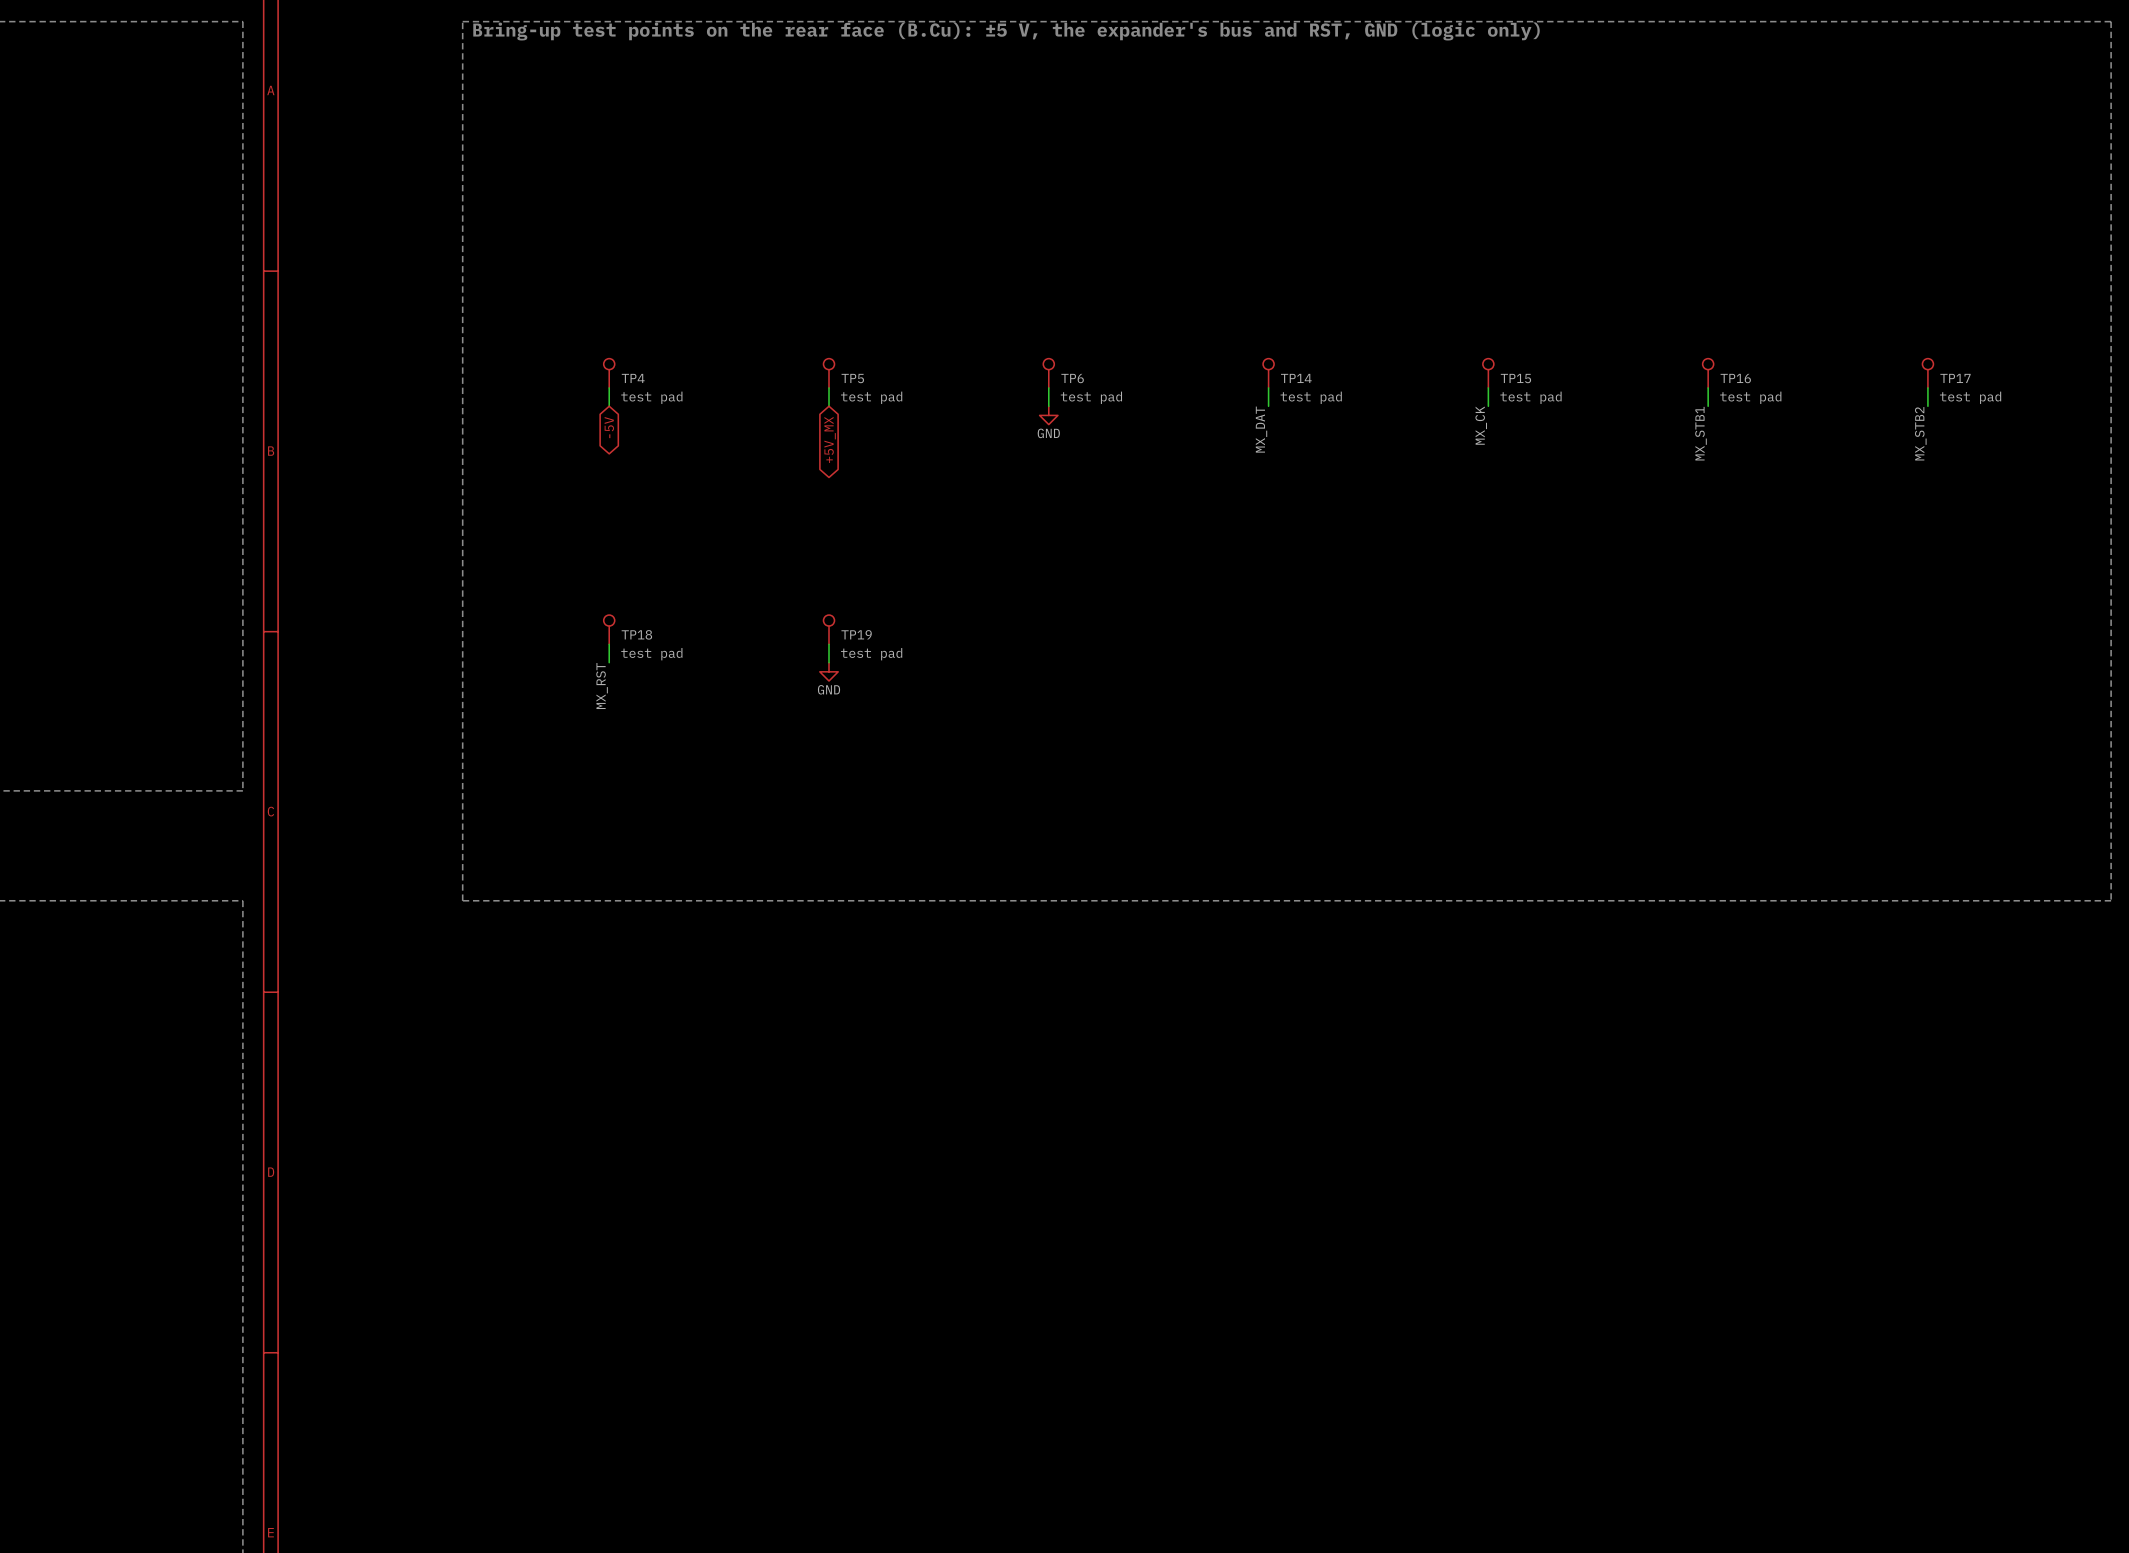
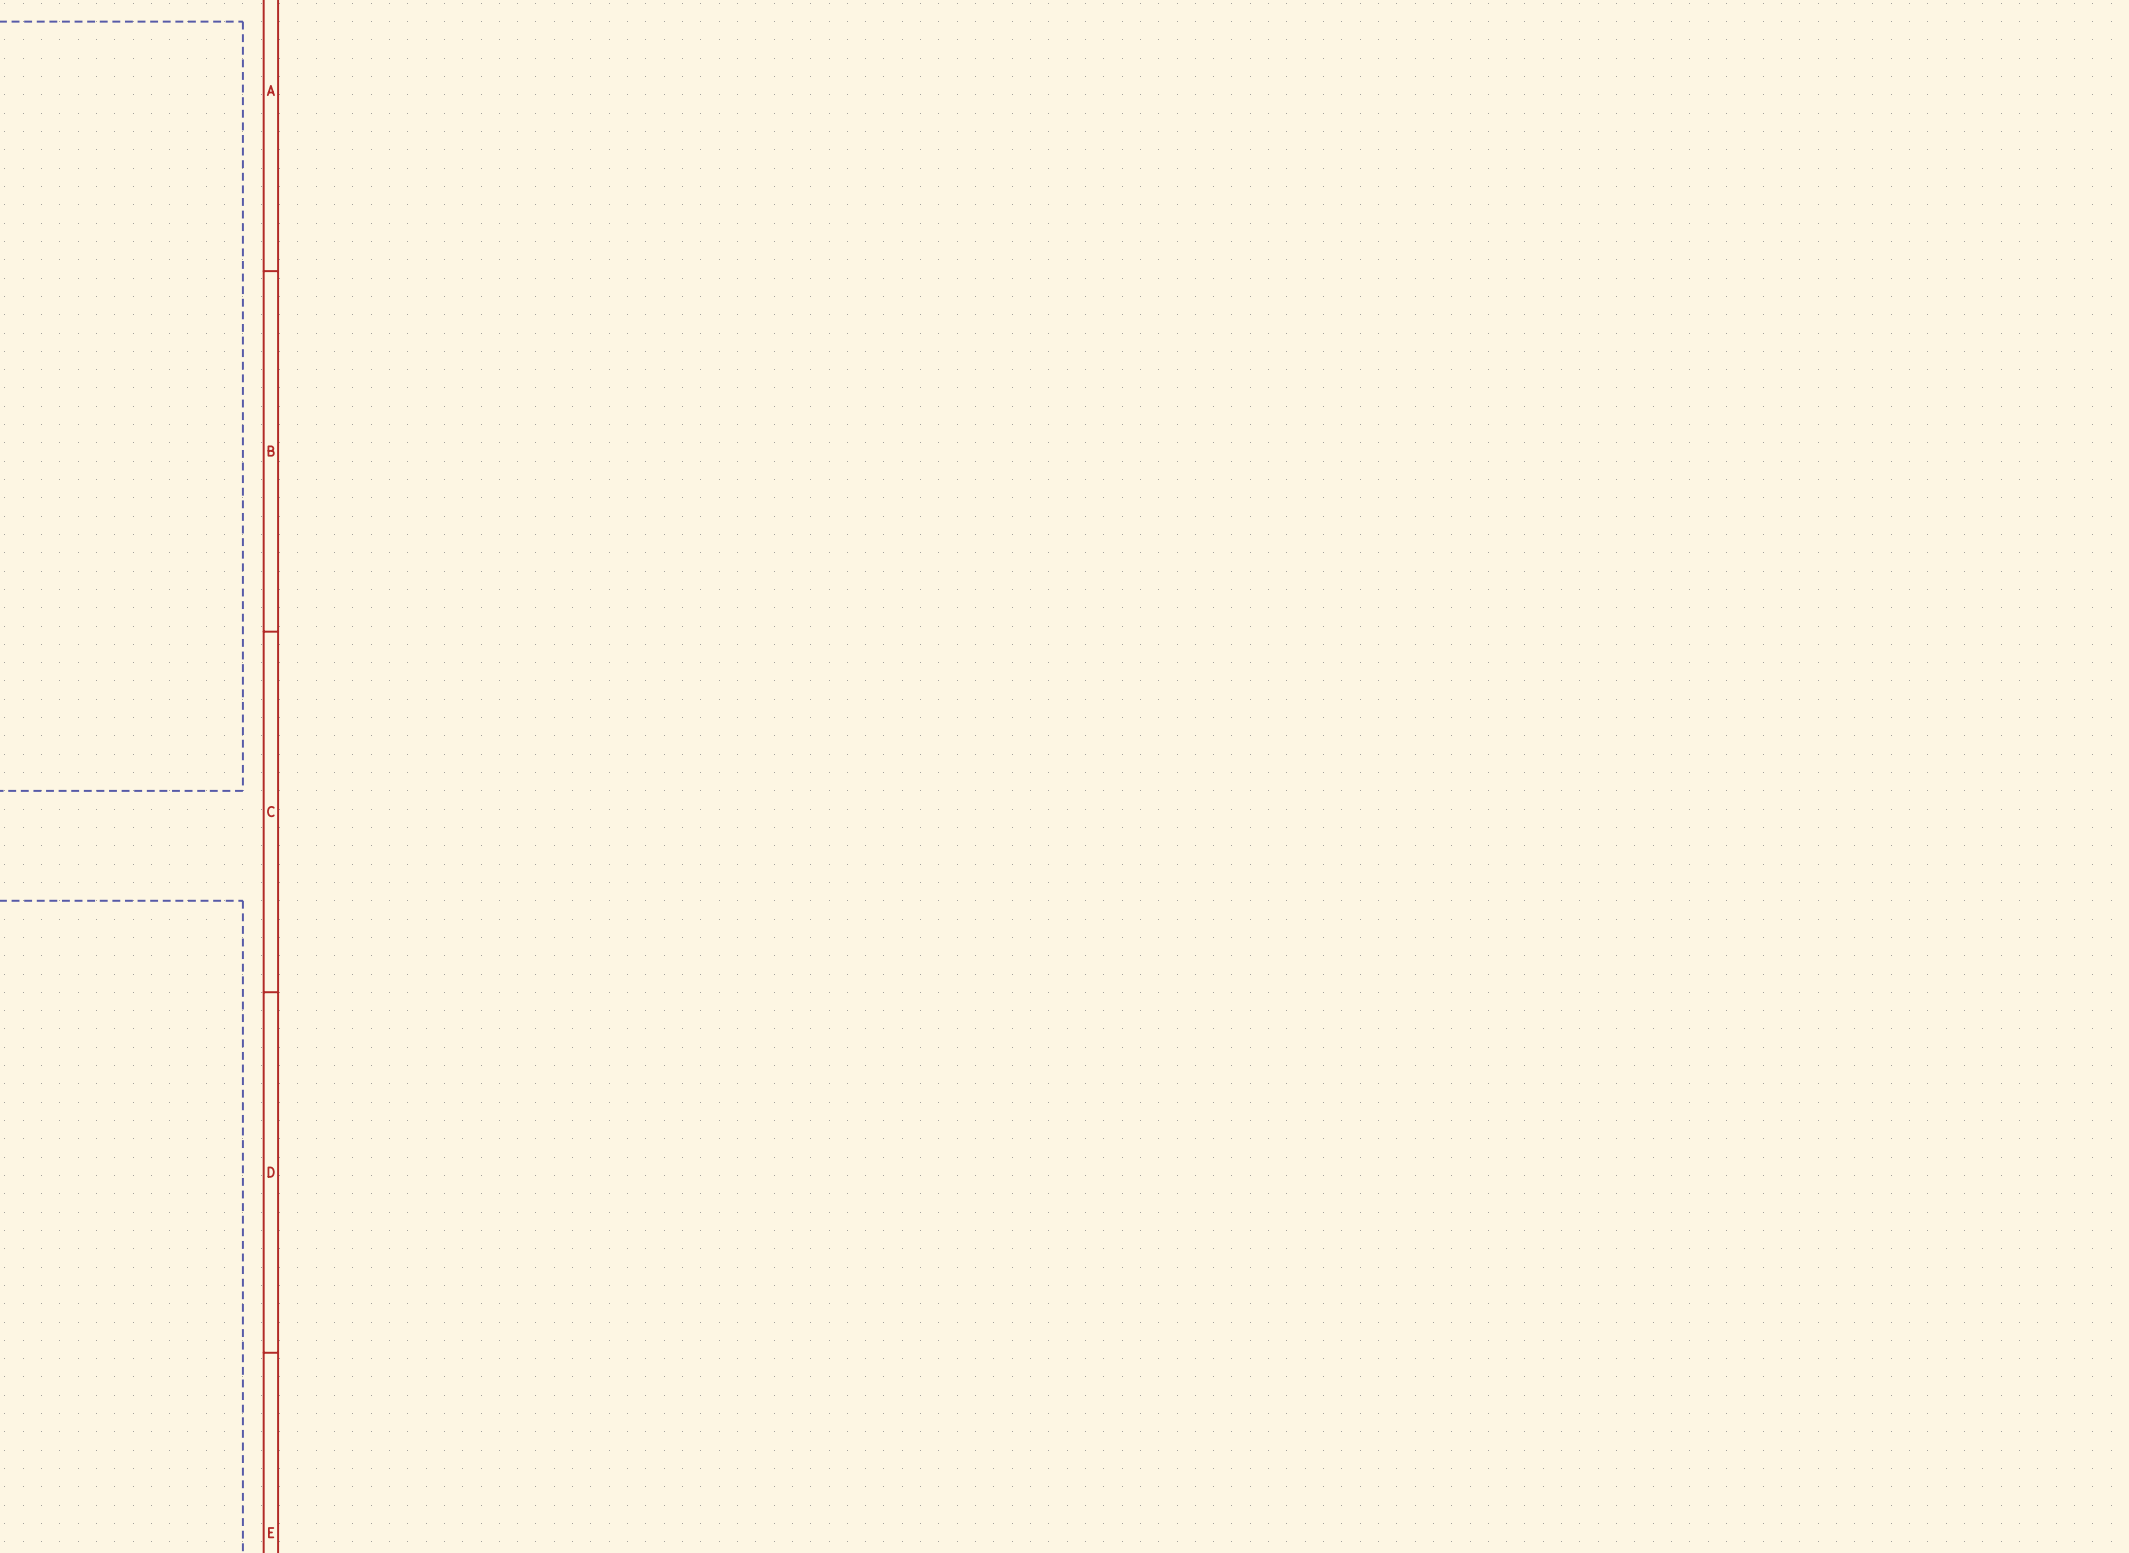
line: (462, 21) (2111, 21) (2111, 900) (462, 900) (462, 21) -> none
text: Bring-up test points on the rear face (B.Cu): ±5 V, the expander's bus and RST, GND (logic only) (1006, 31) -> none
TP4: test pad (609, 373) -> none
TP5: test pad (829, 373) -> none
TP6: test pad (1048, 373) -> none
TP14: test pad (1268, 373) -> none
TP15: test pad (1488, 373) -> none
TP16: test pad (1708, 373) -> none
TP17: test pad (1927, 373) -> none
wire: (609, 387) (609, 406) -> none
wire: (829, 387) (829, 406) -> none
wire: (1048, 387) (1048, 406) -> none
wire: (1268, 387) (1268, 406) -> none
wire: (1488, 387) (1488, 406) -> none
wire: (1708, 387) (1708, 406) -> none
wire: (1927, 387) (1927, 406) -> none
power symbol: GND (1048, 415) -> none
label: MX_CK (1481, 425) -> none
global label: -5V (609, 427) -> none
label: MX_DAT (1261, 429) -> none
label: MX_STB1 (1701, 433) -> none
label: MX_STB2 (1920, 433) -> none
global label: +5V_MX (830, 439) -> none
TP18: test pad (609, 629) -> none
TP19: test pad (829, 629) -> none
wire: (609, 644) (609, 662) -> none
wire: (829, 644) (829, 662) -> none
power symbol: GND (829, 671) -> none
label: MX_RST (602, 686) -> none

